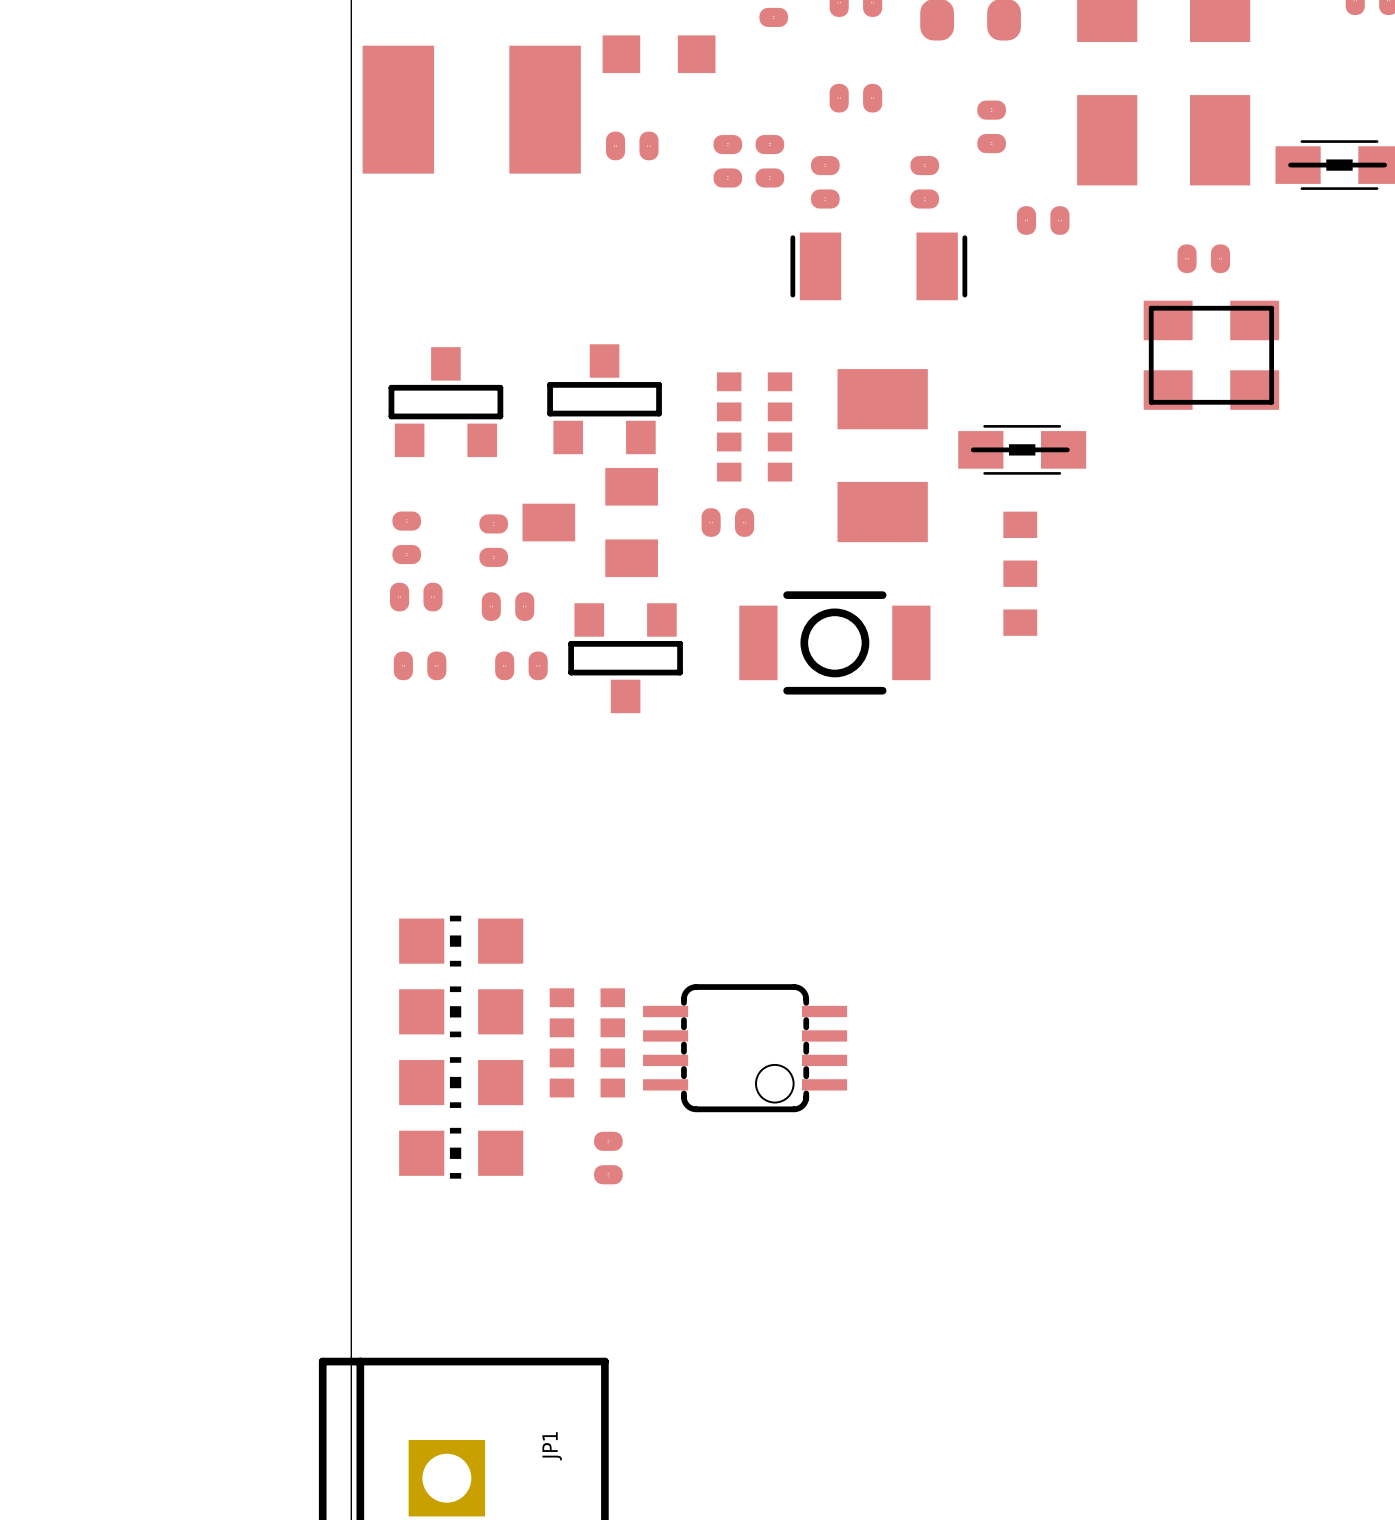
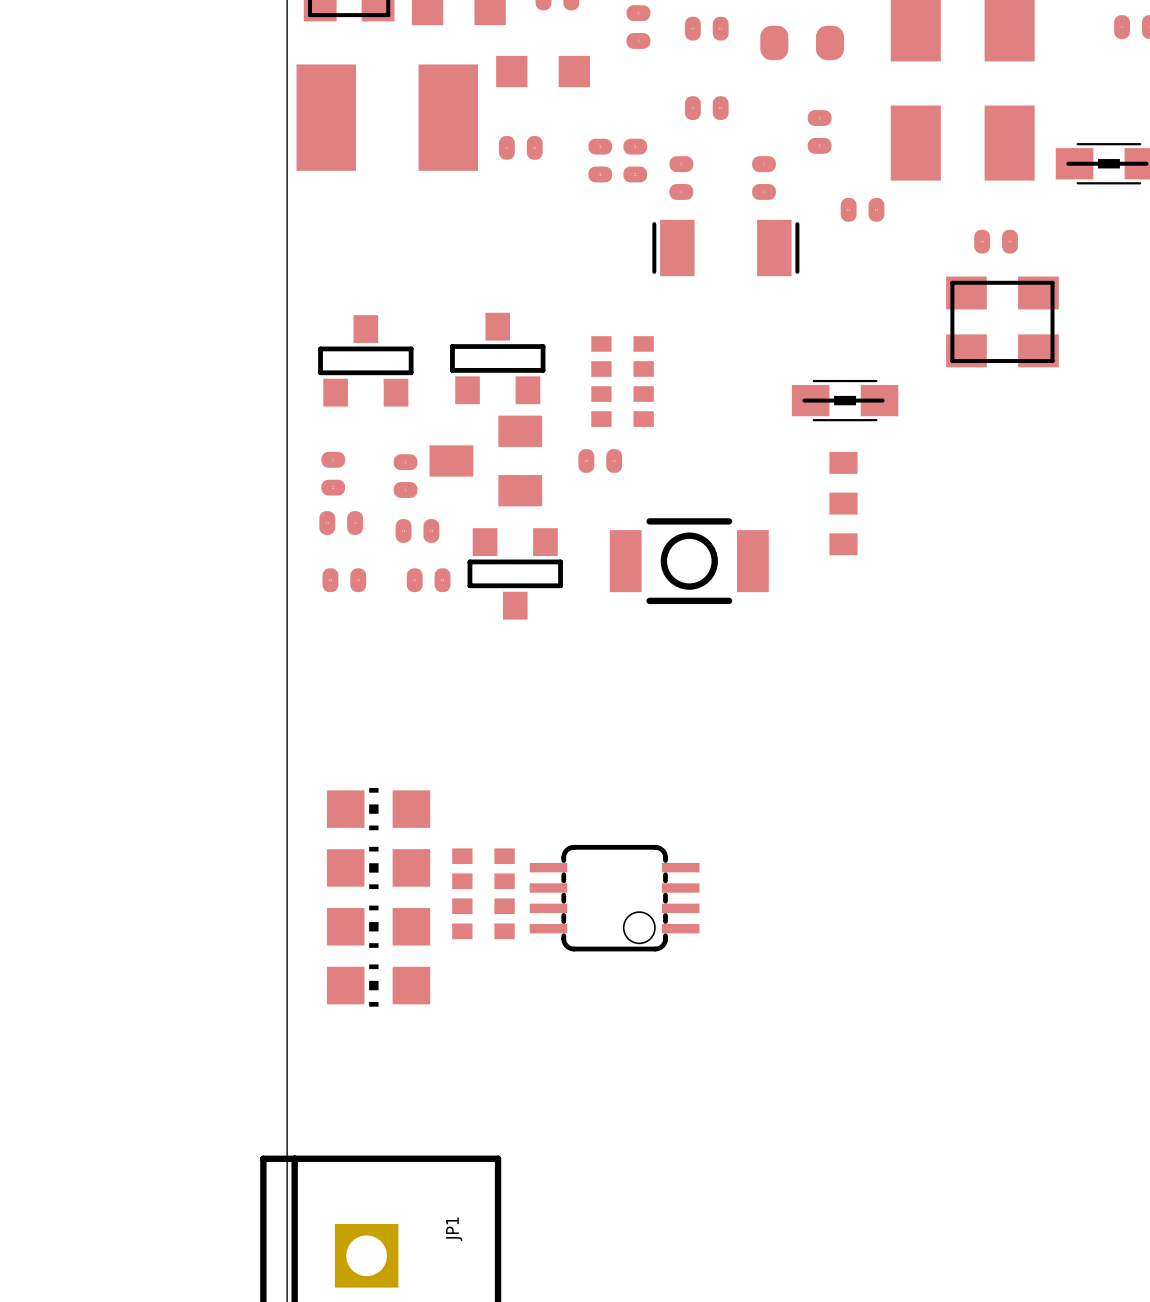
part: (882, 455) -> none
part: (608, 1158) -> none

